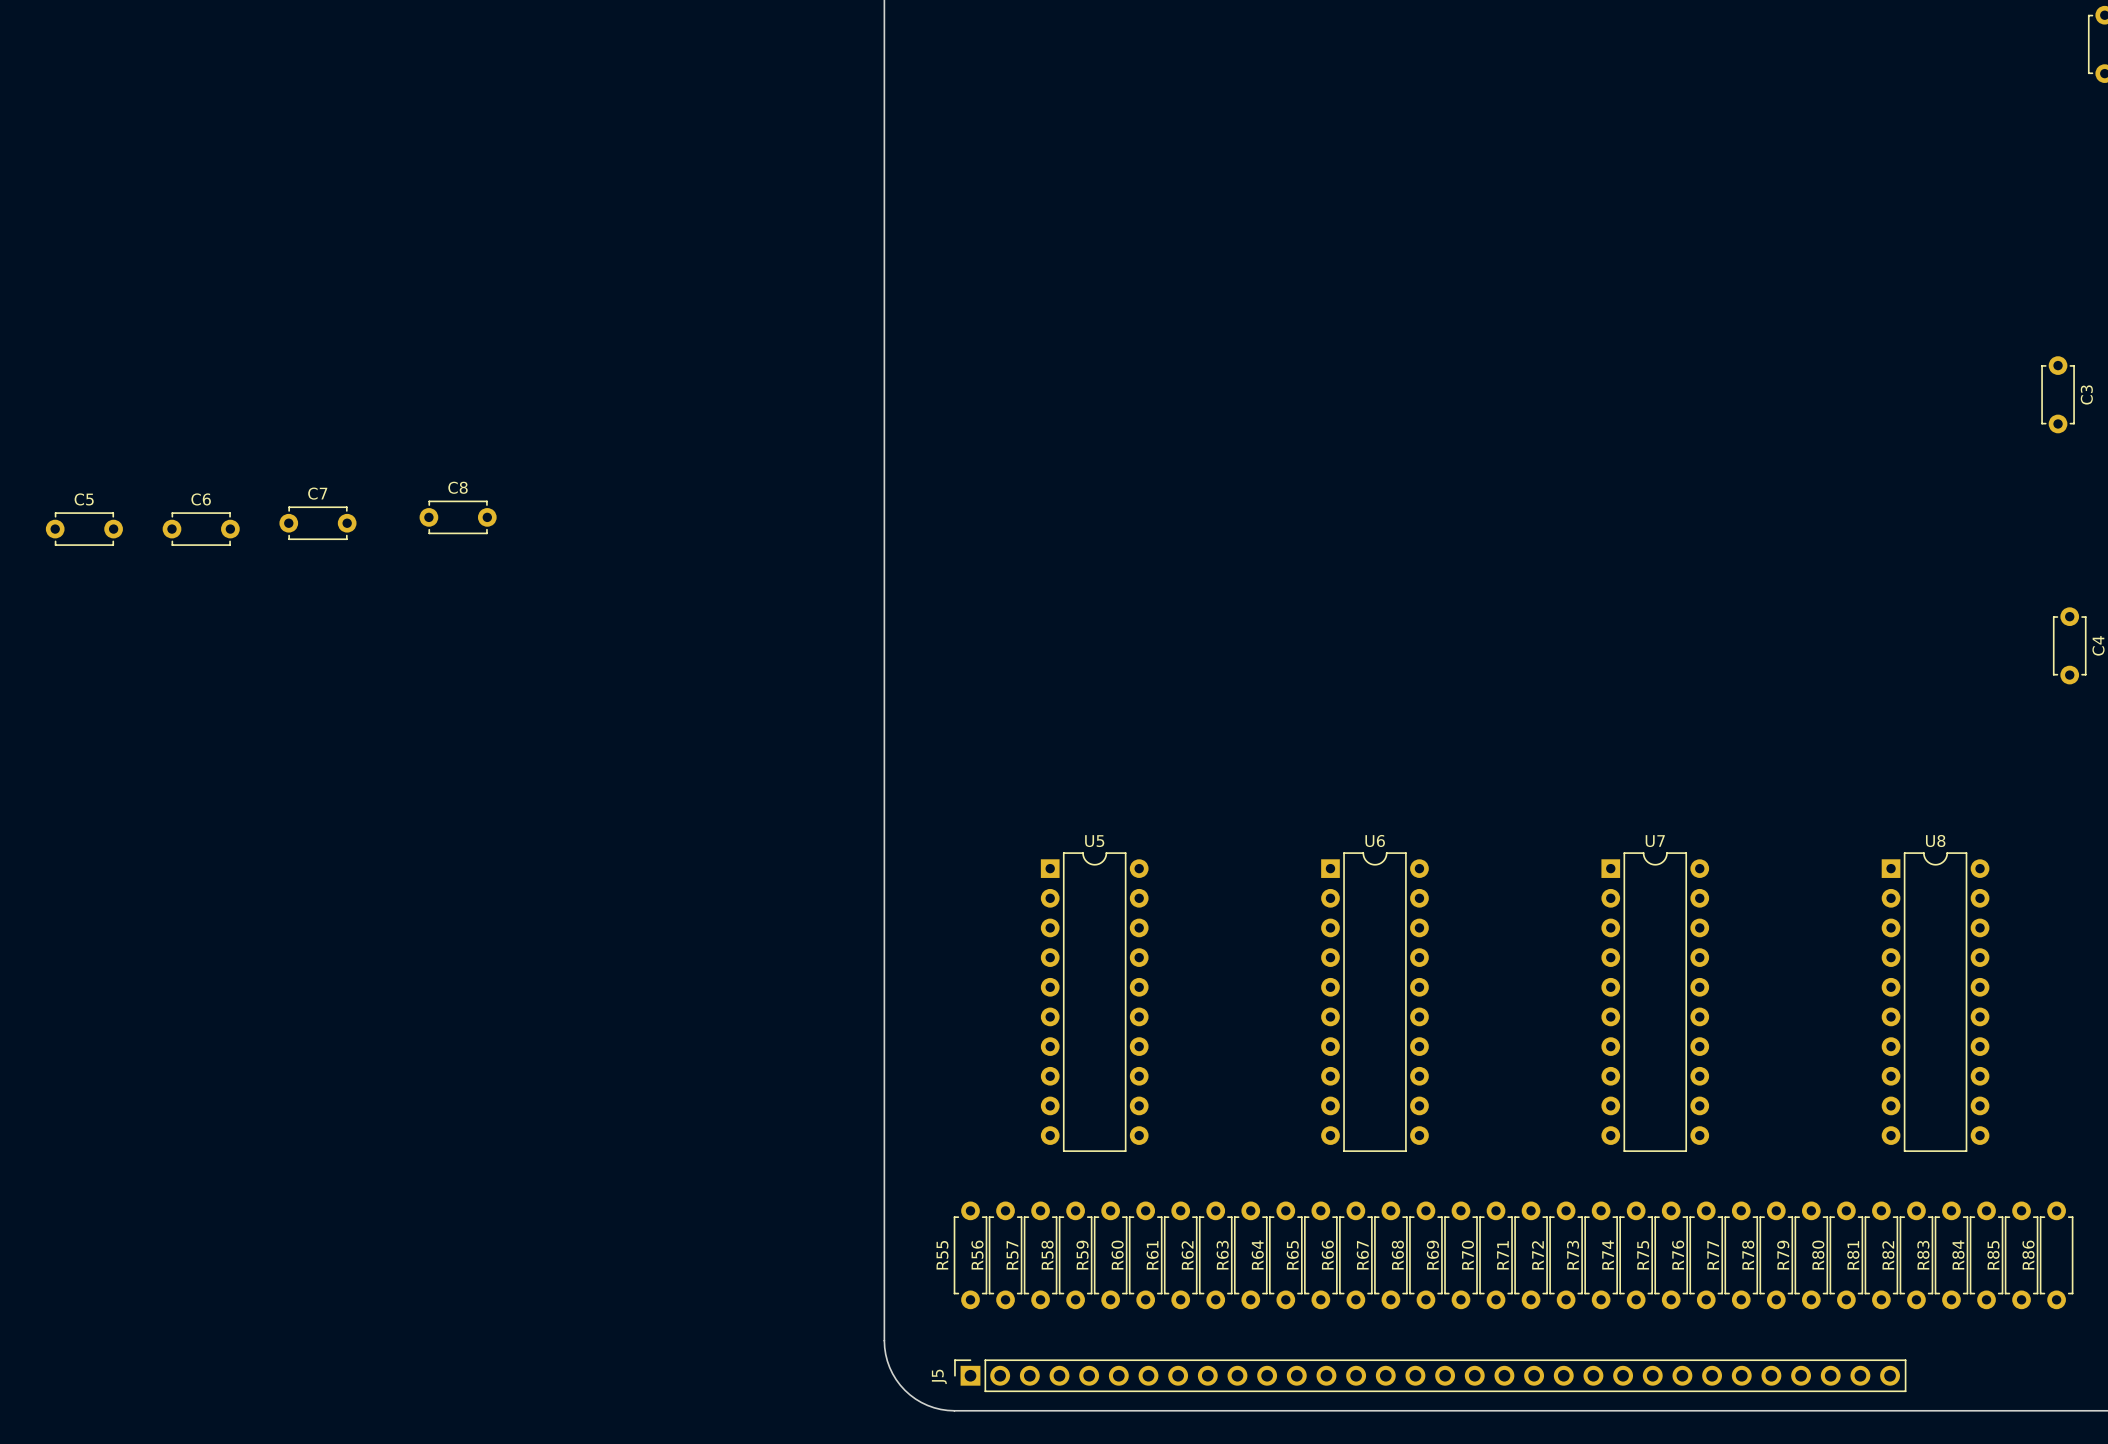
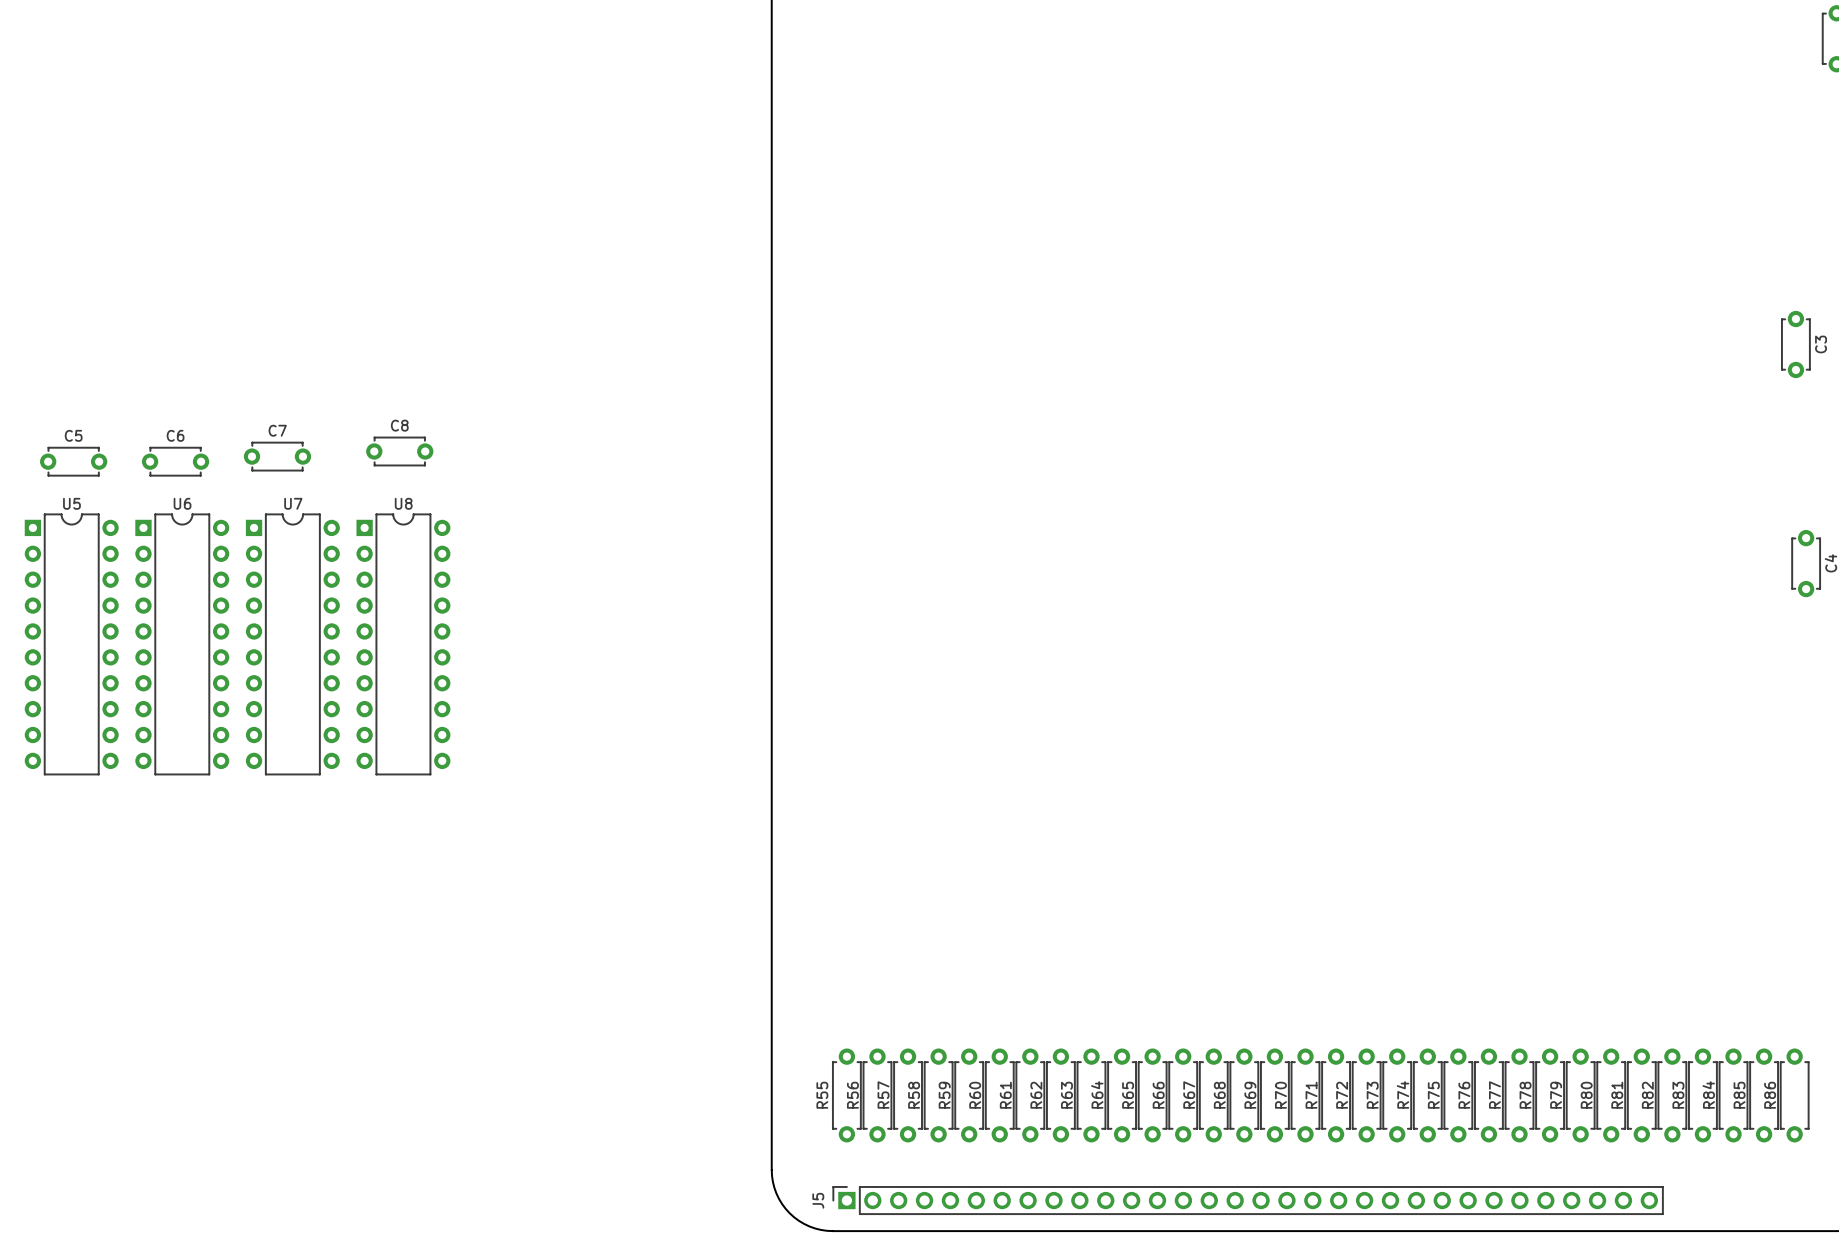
U5 position: (1094, 1002) -> (71, 644)
U6 position: (1374, 1002) -> (182, 644)
U7 position: (1655, 1002) -> (292, 644)
U8 position: (1935, 1002) -> (403, 644)

